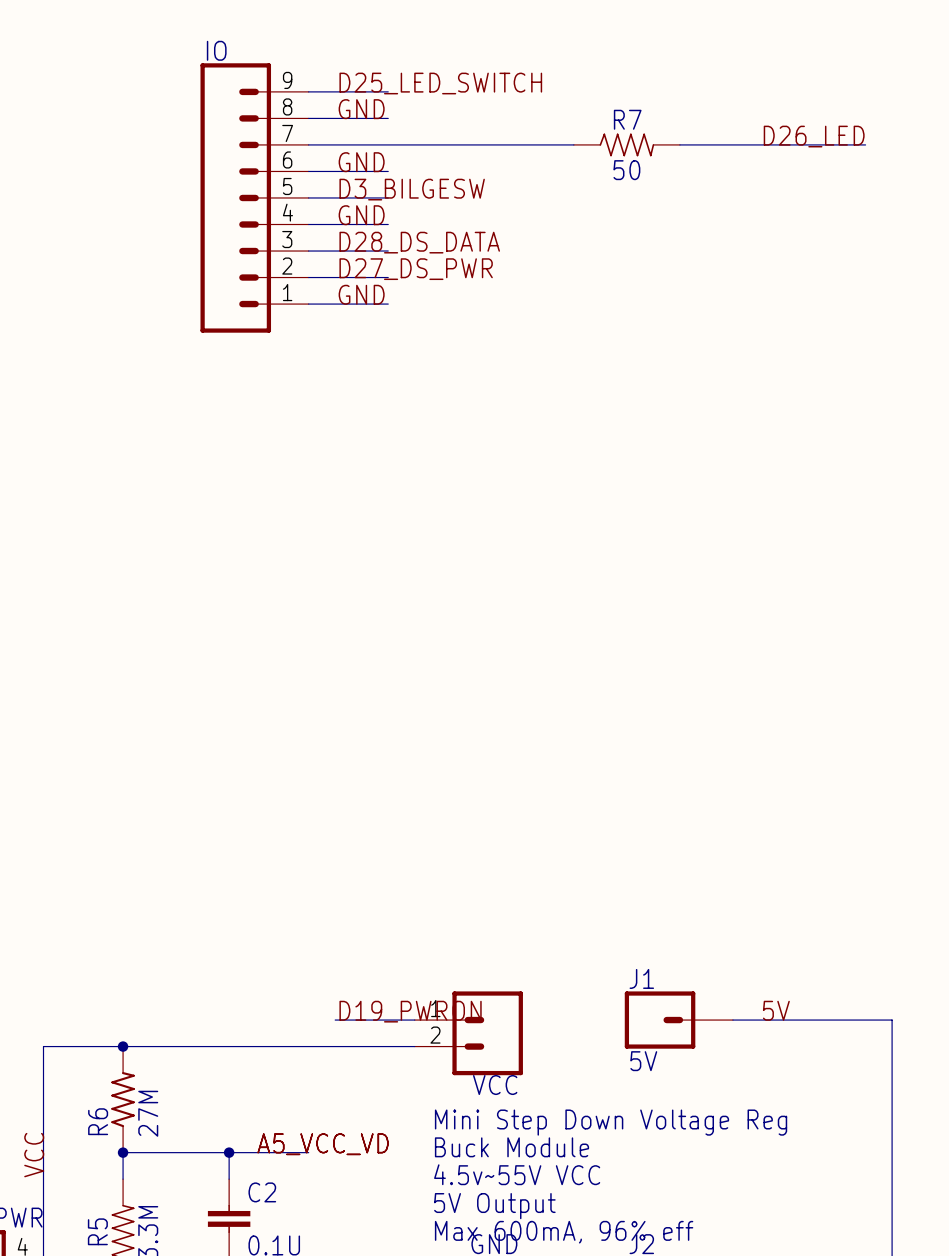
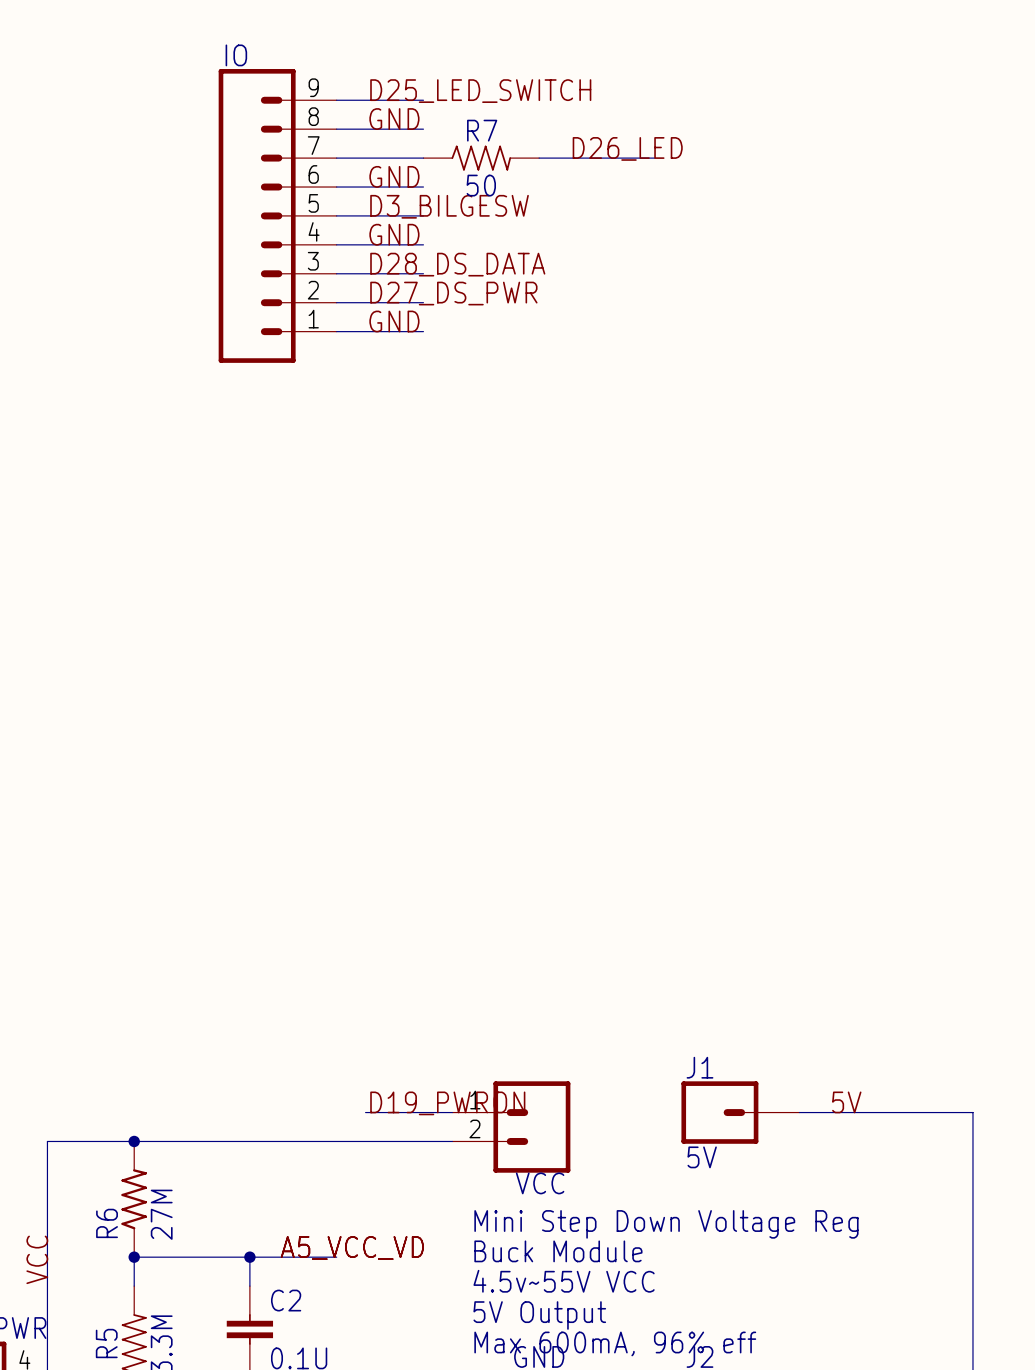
label position: D26_LED (814, 136) -> D26_LED (627, 148)
R7 position: (626, 144) -> (481, 158)
wire: (679, 144) (865, 144) -> none

